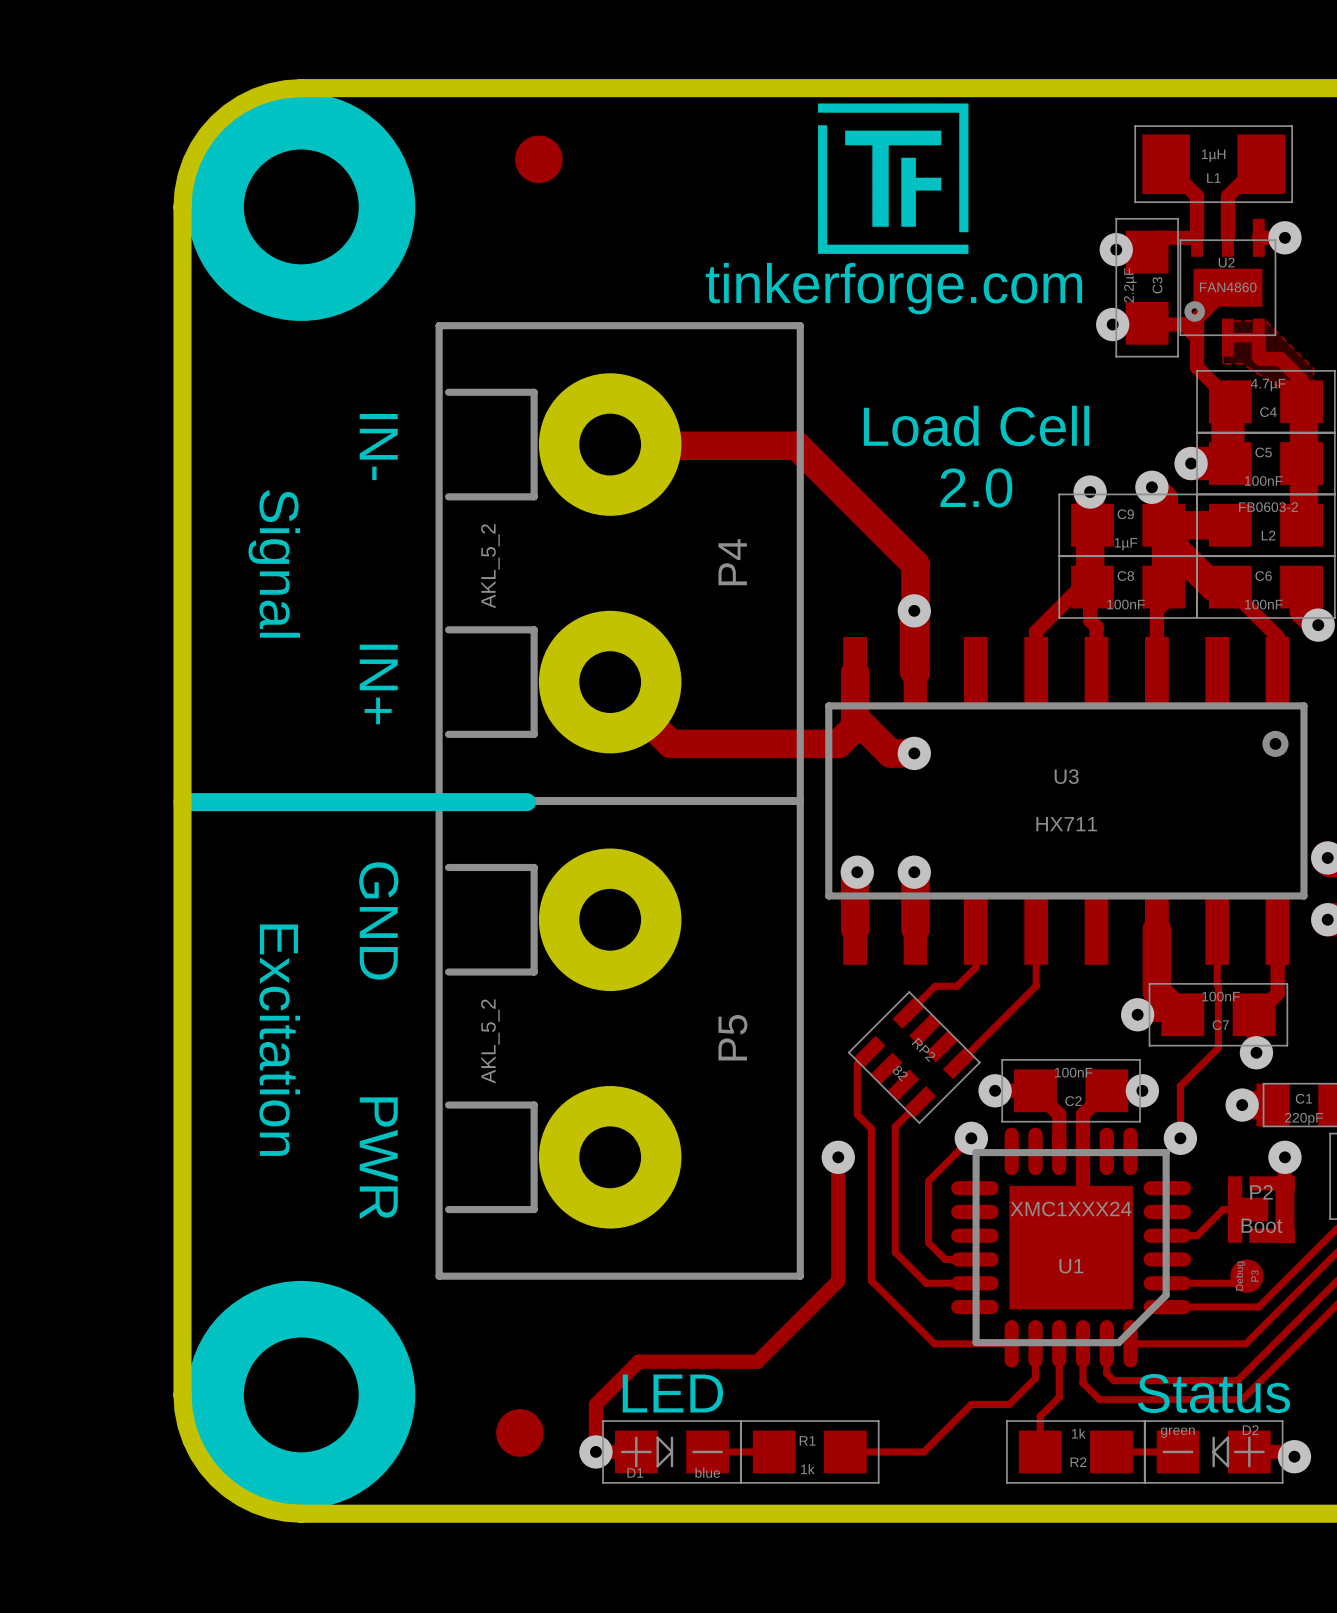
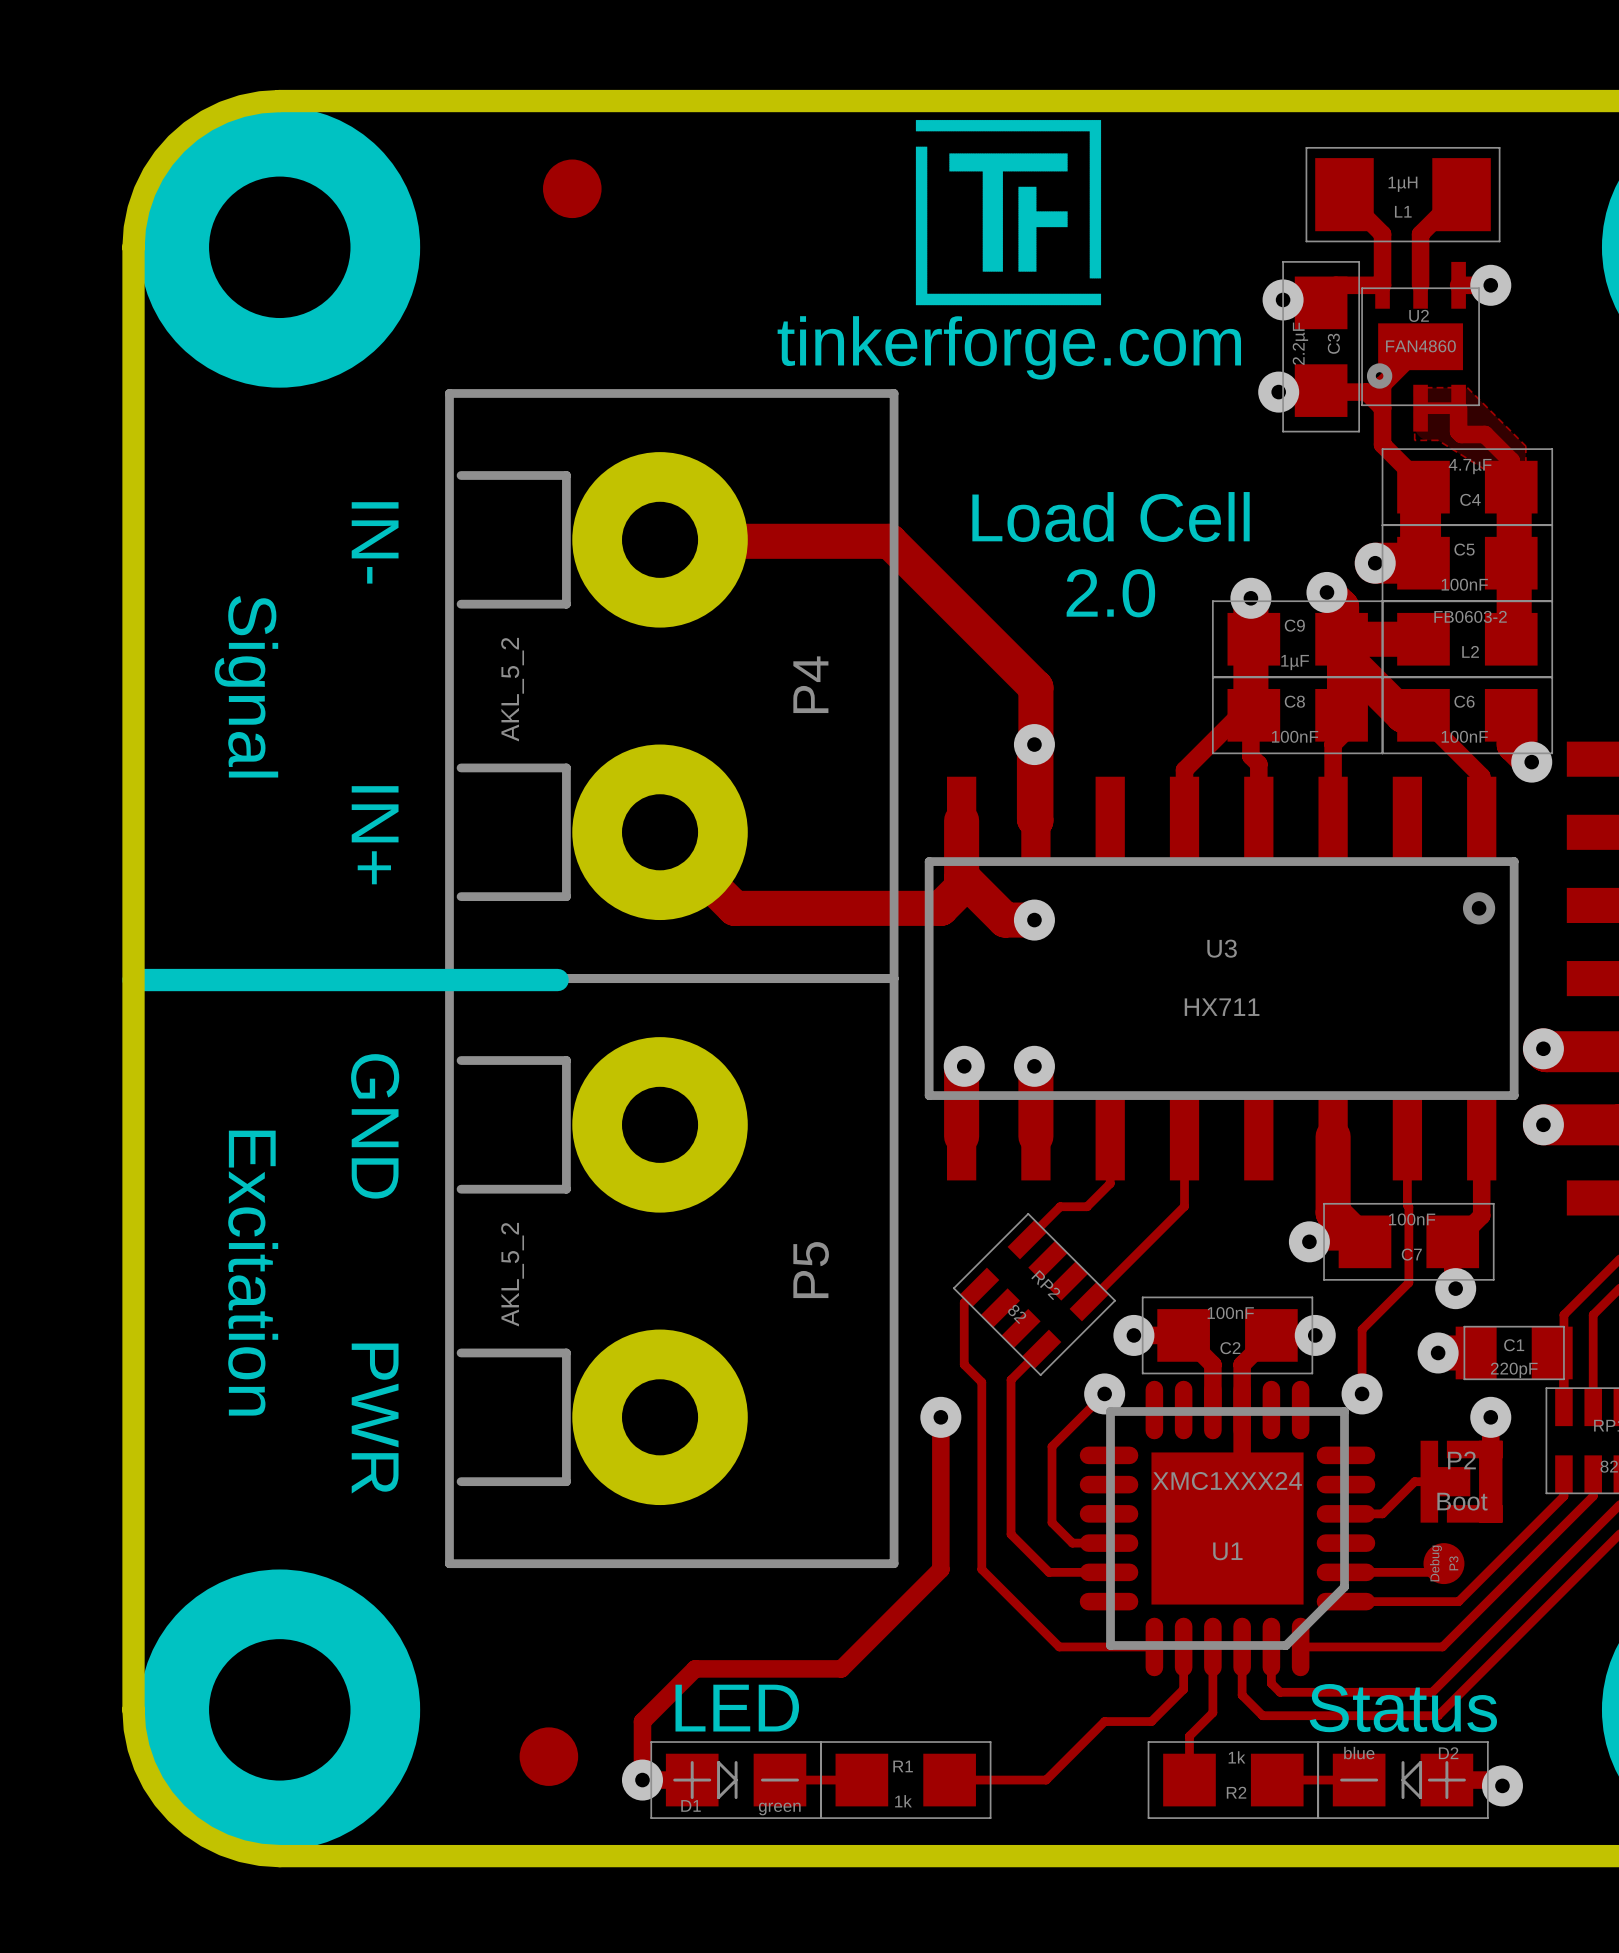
D2 value: green (1177, 1432) -> blue (1359, 1753)
D1 value: blue (707, 1472) -> green (779, 1808)

